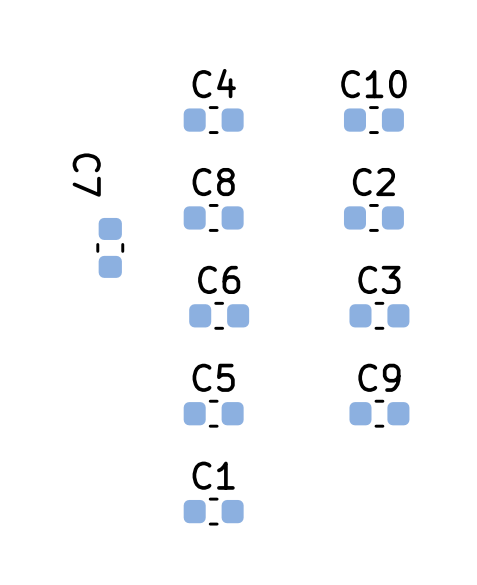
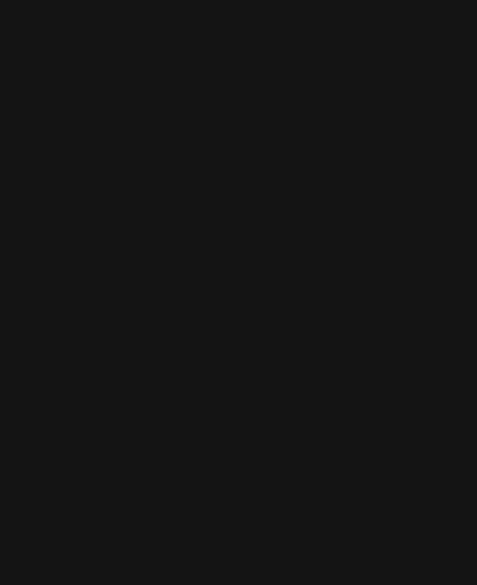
C4: (213, 120) -> none
C10: (373, 120) -> none
C8: (213, 217) -> none
C2: (373, 217) -> none
C7: (110, 247) -> none
C6: (219, 315) -> none
C3: (379, 315) -> none
C5: (213, 413) -> none
C9: (379, 413) -> none
C1: (213, 511) -> none

